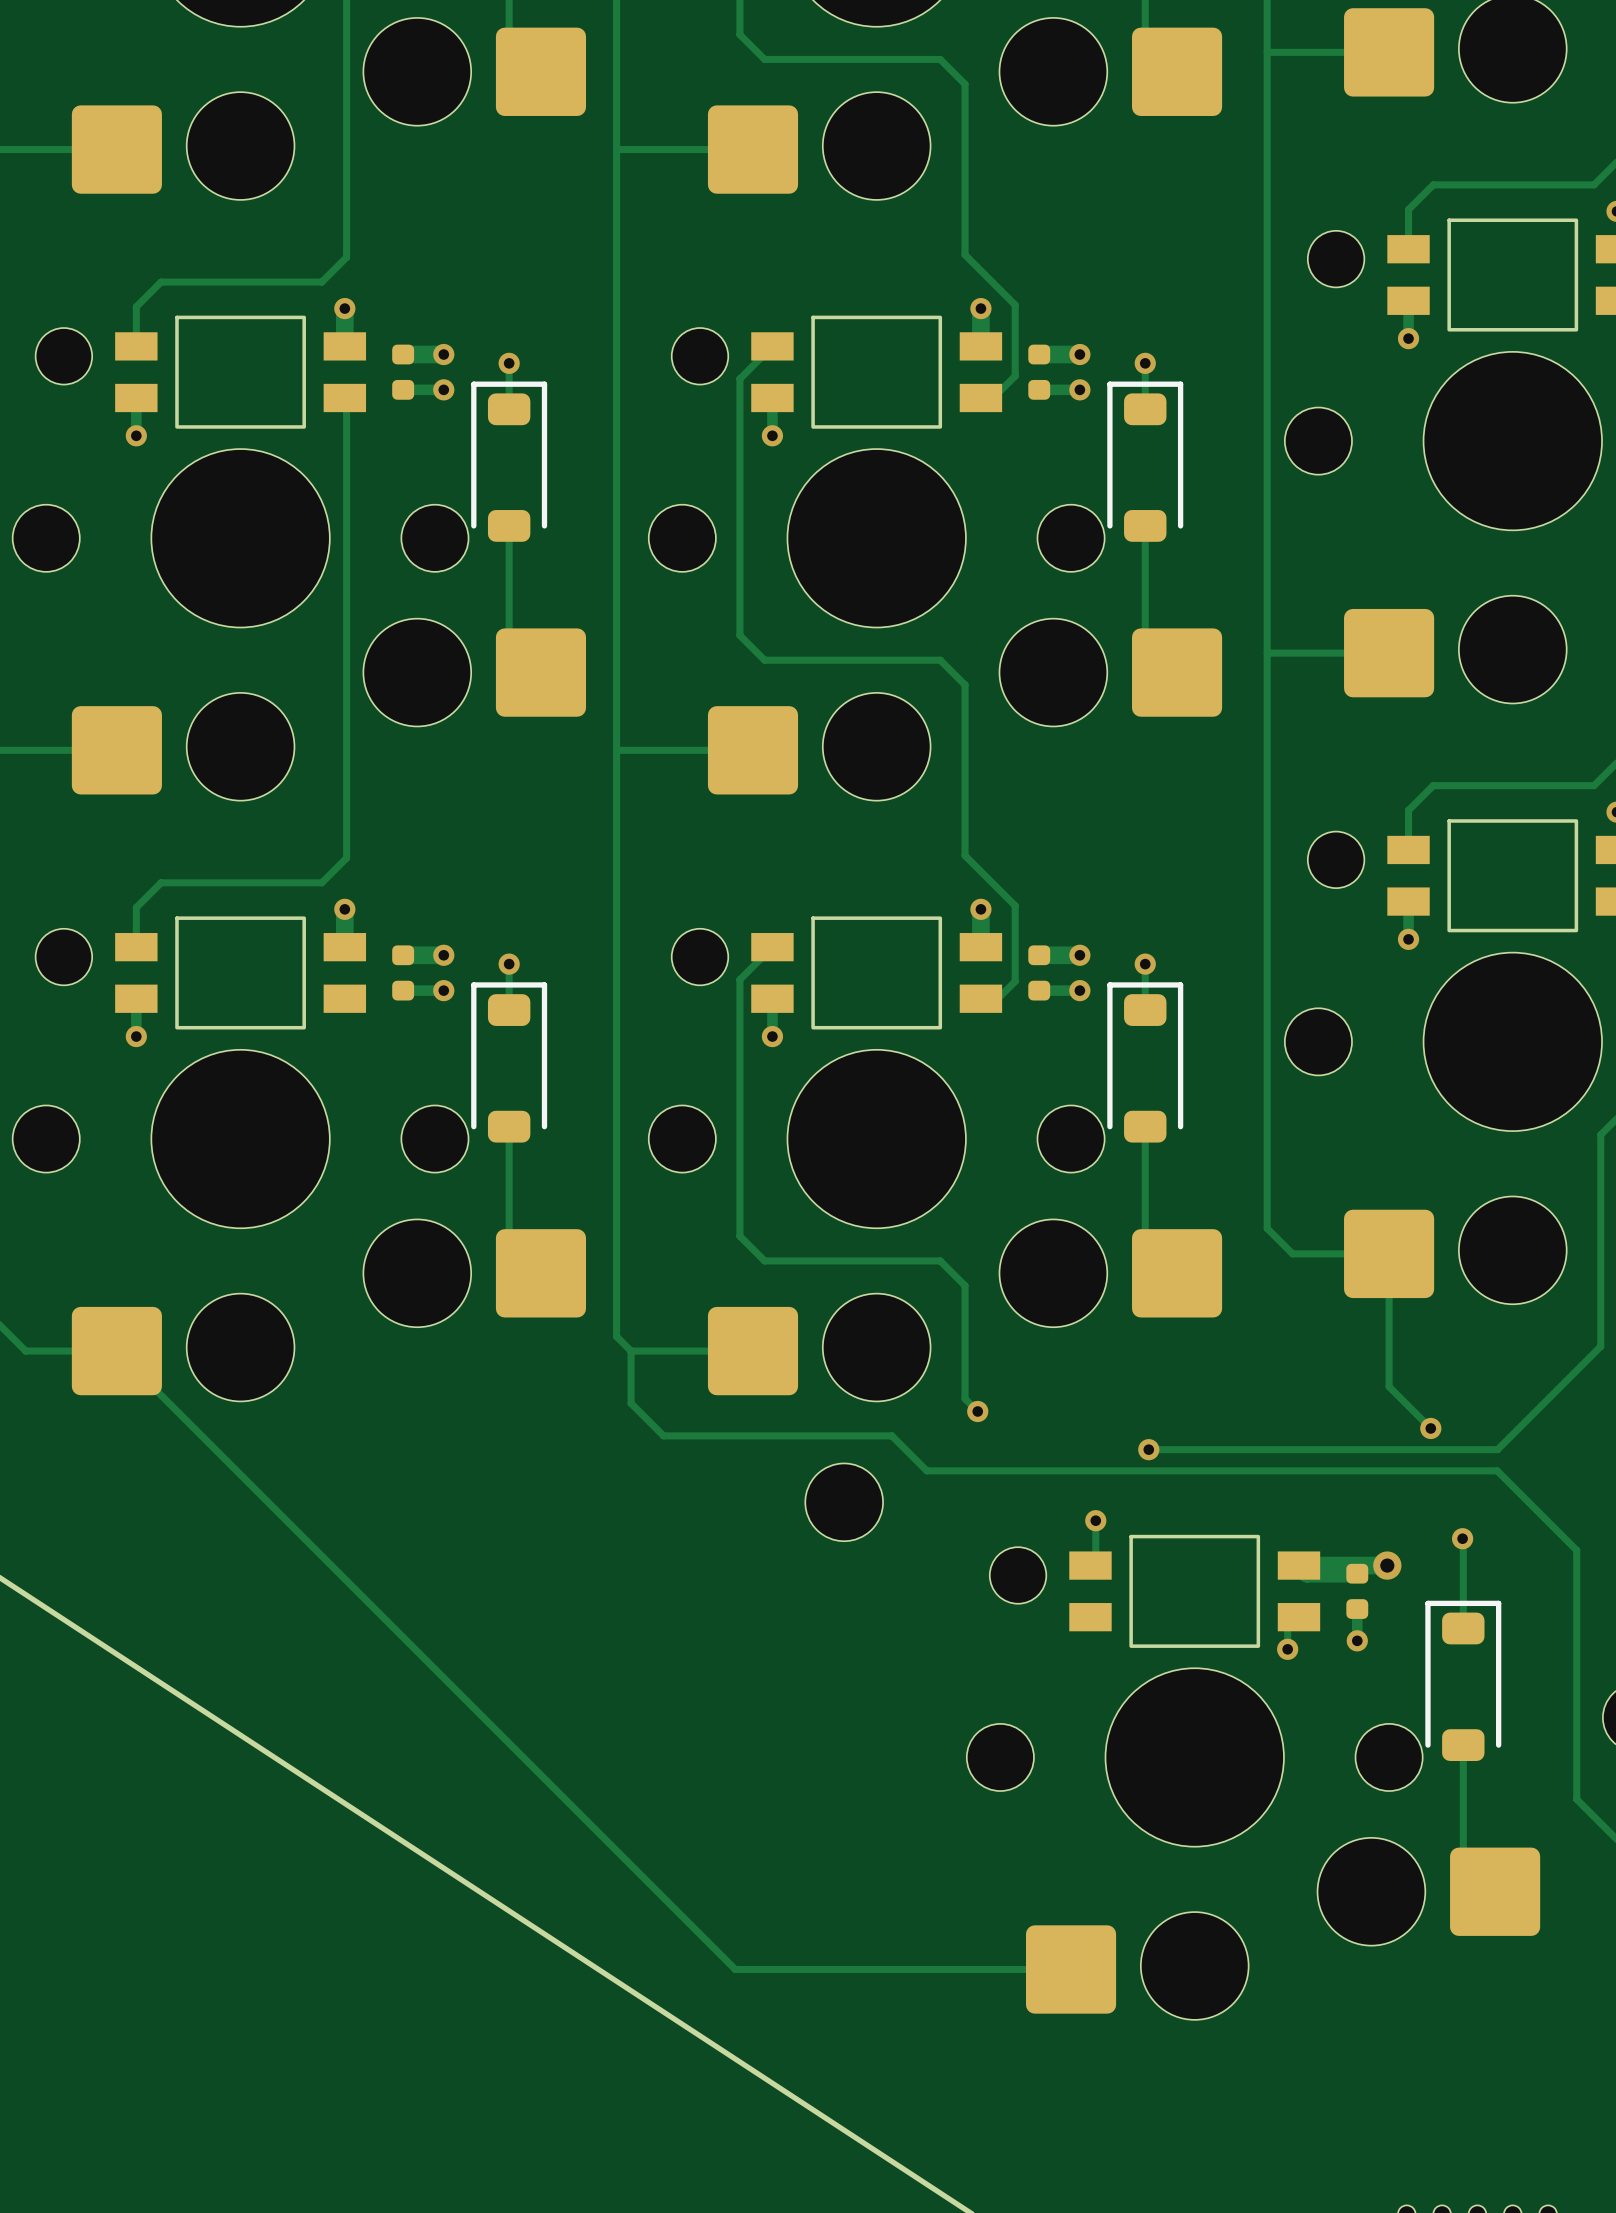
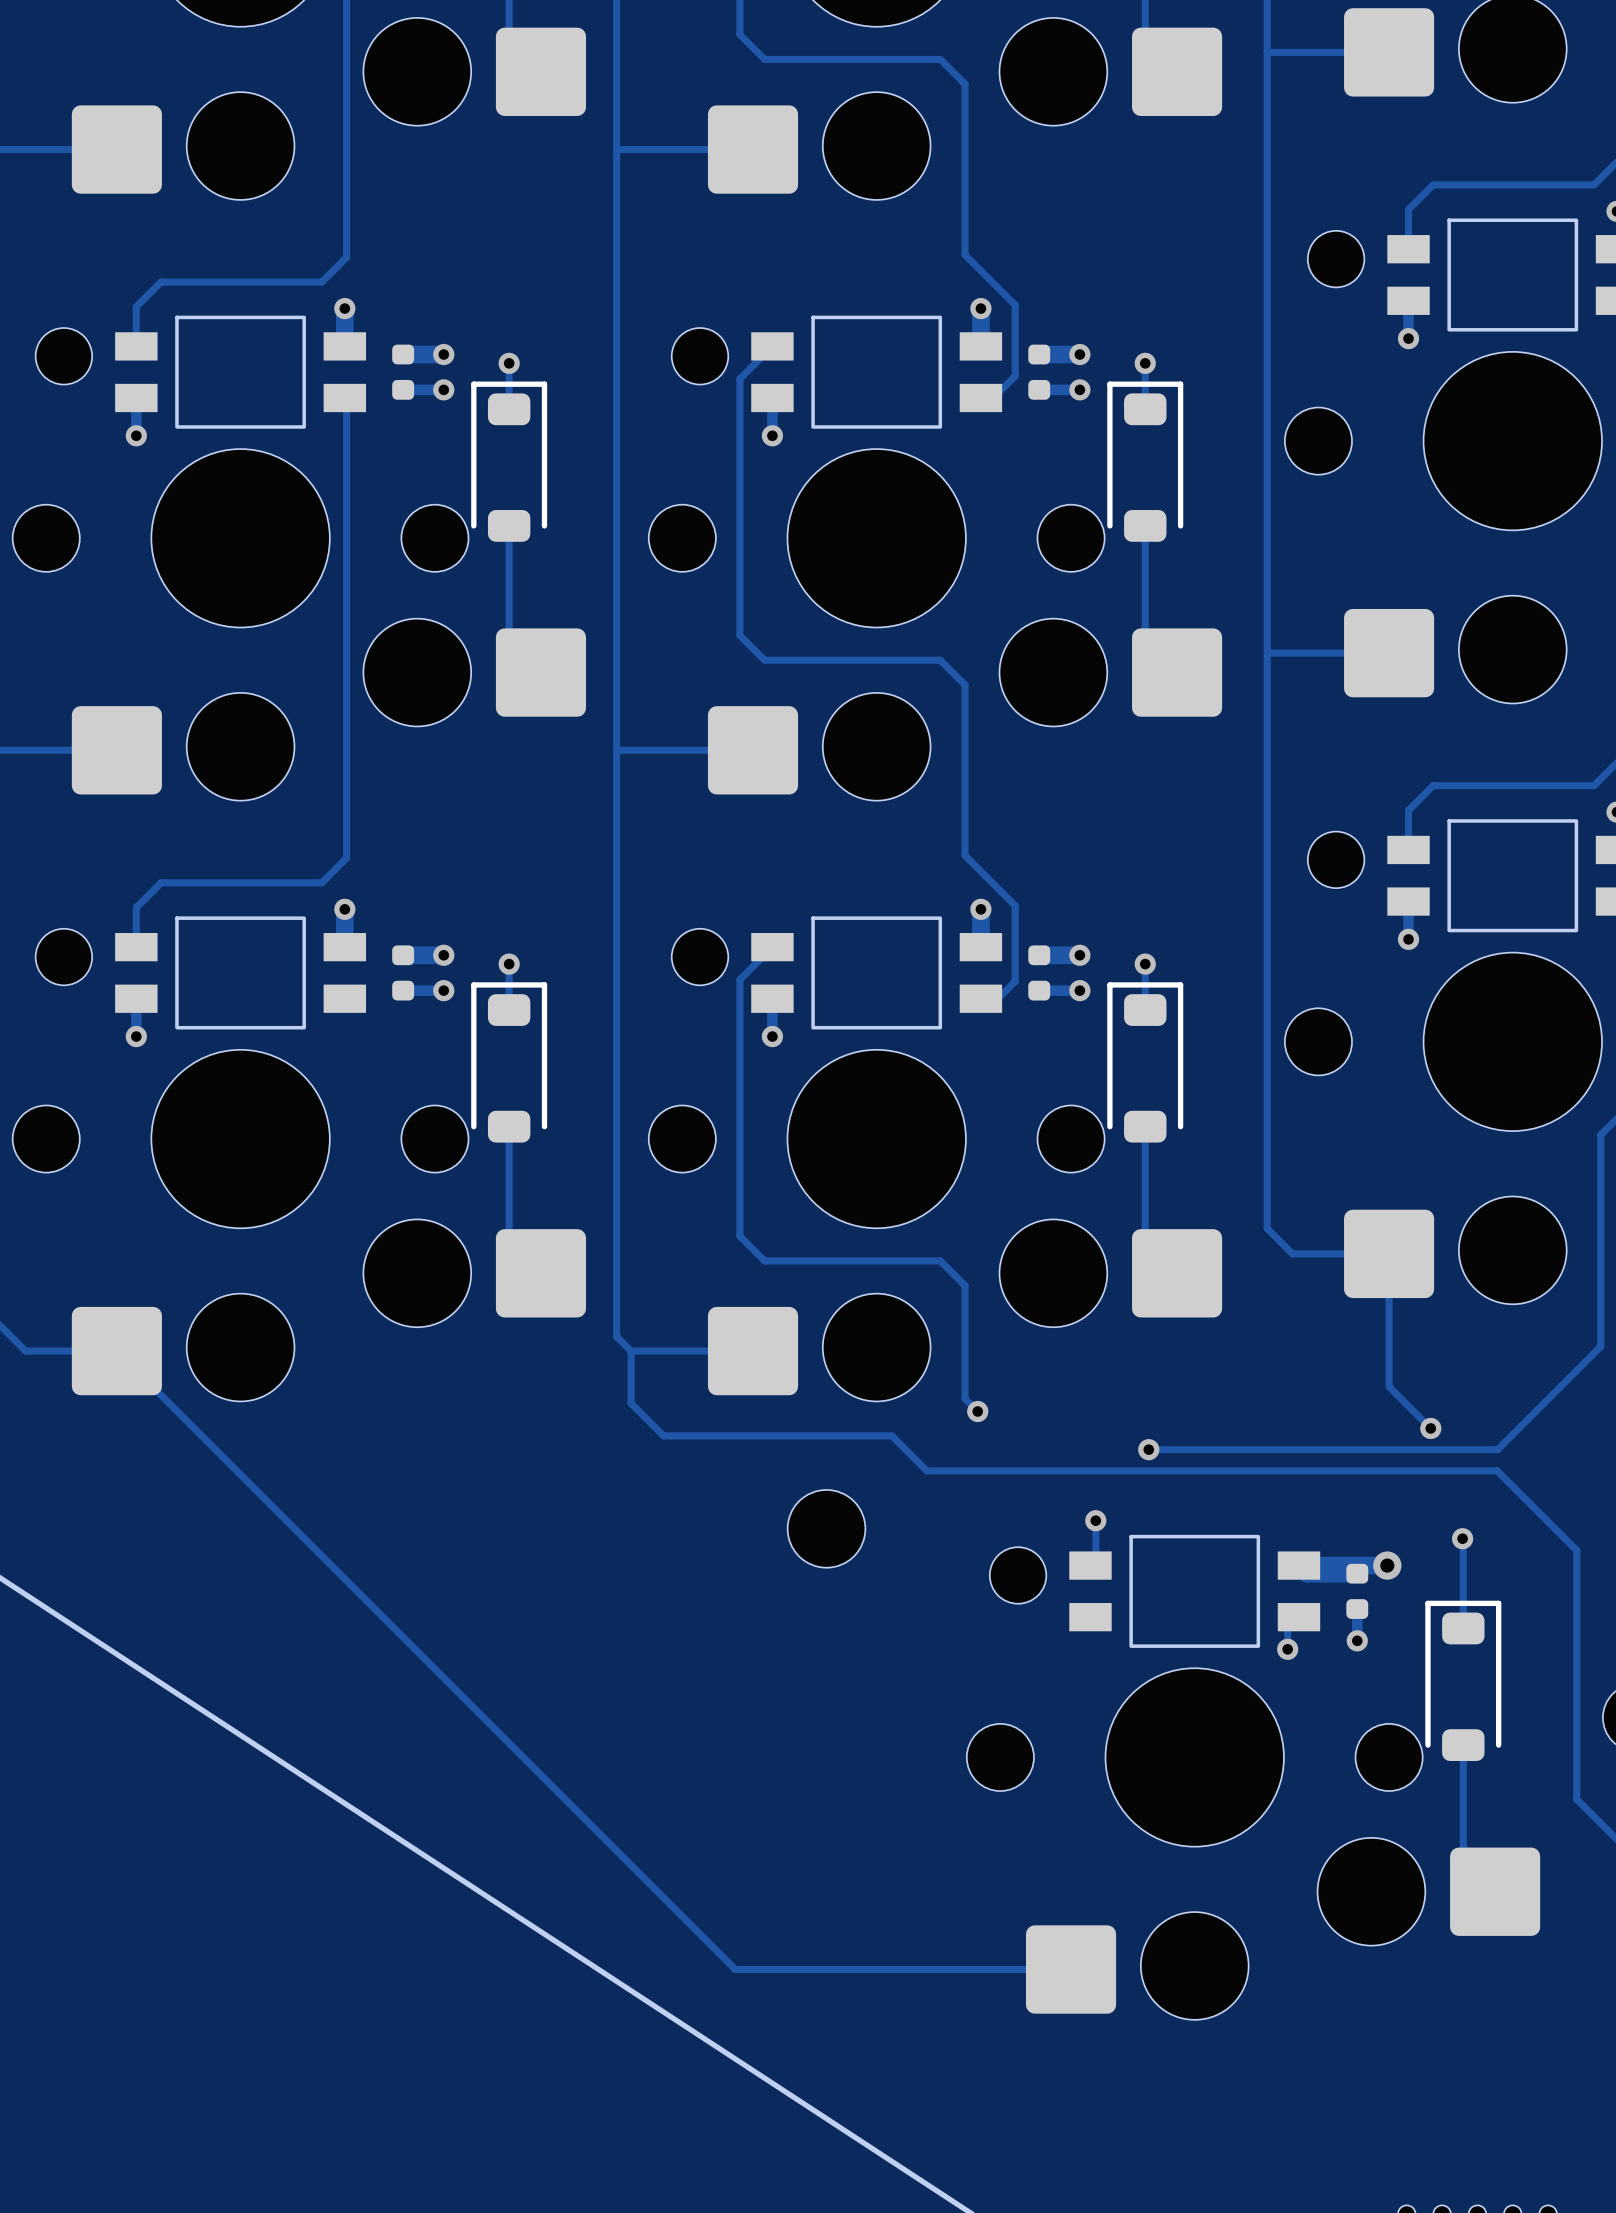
part position: (844, 1502) -> (826, 1528)

